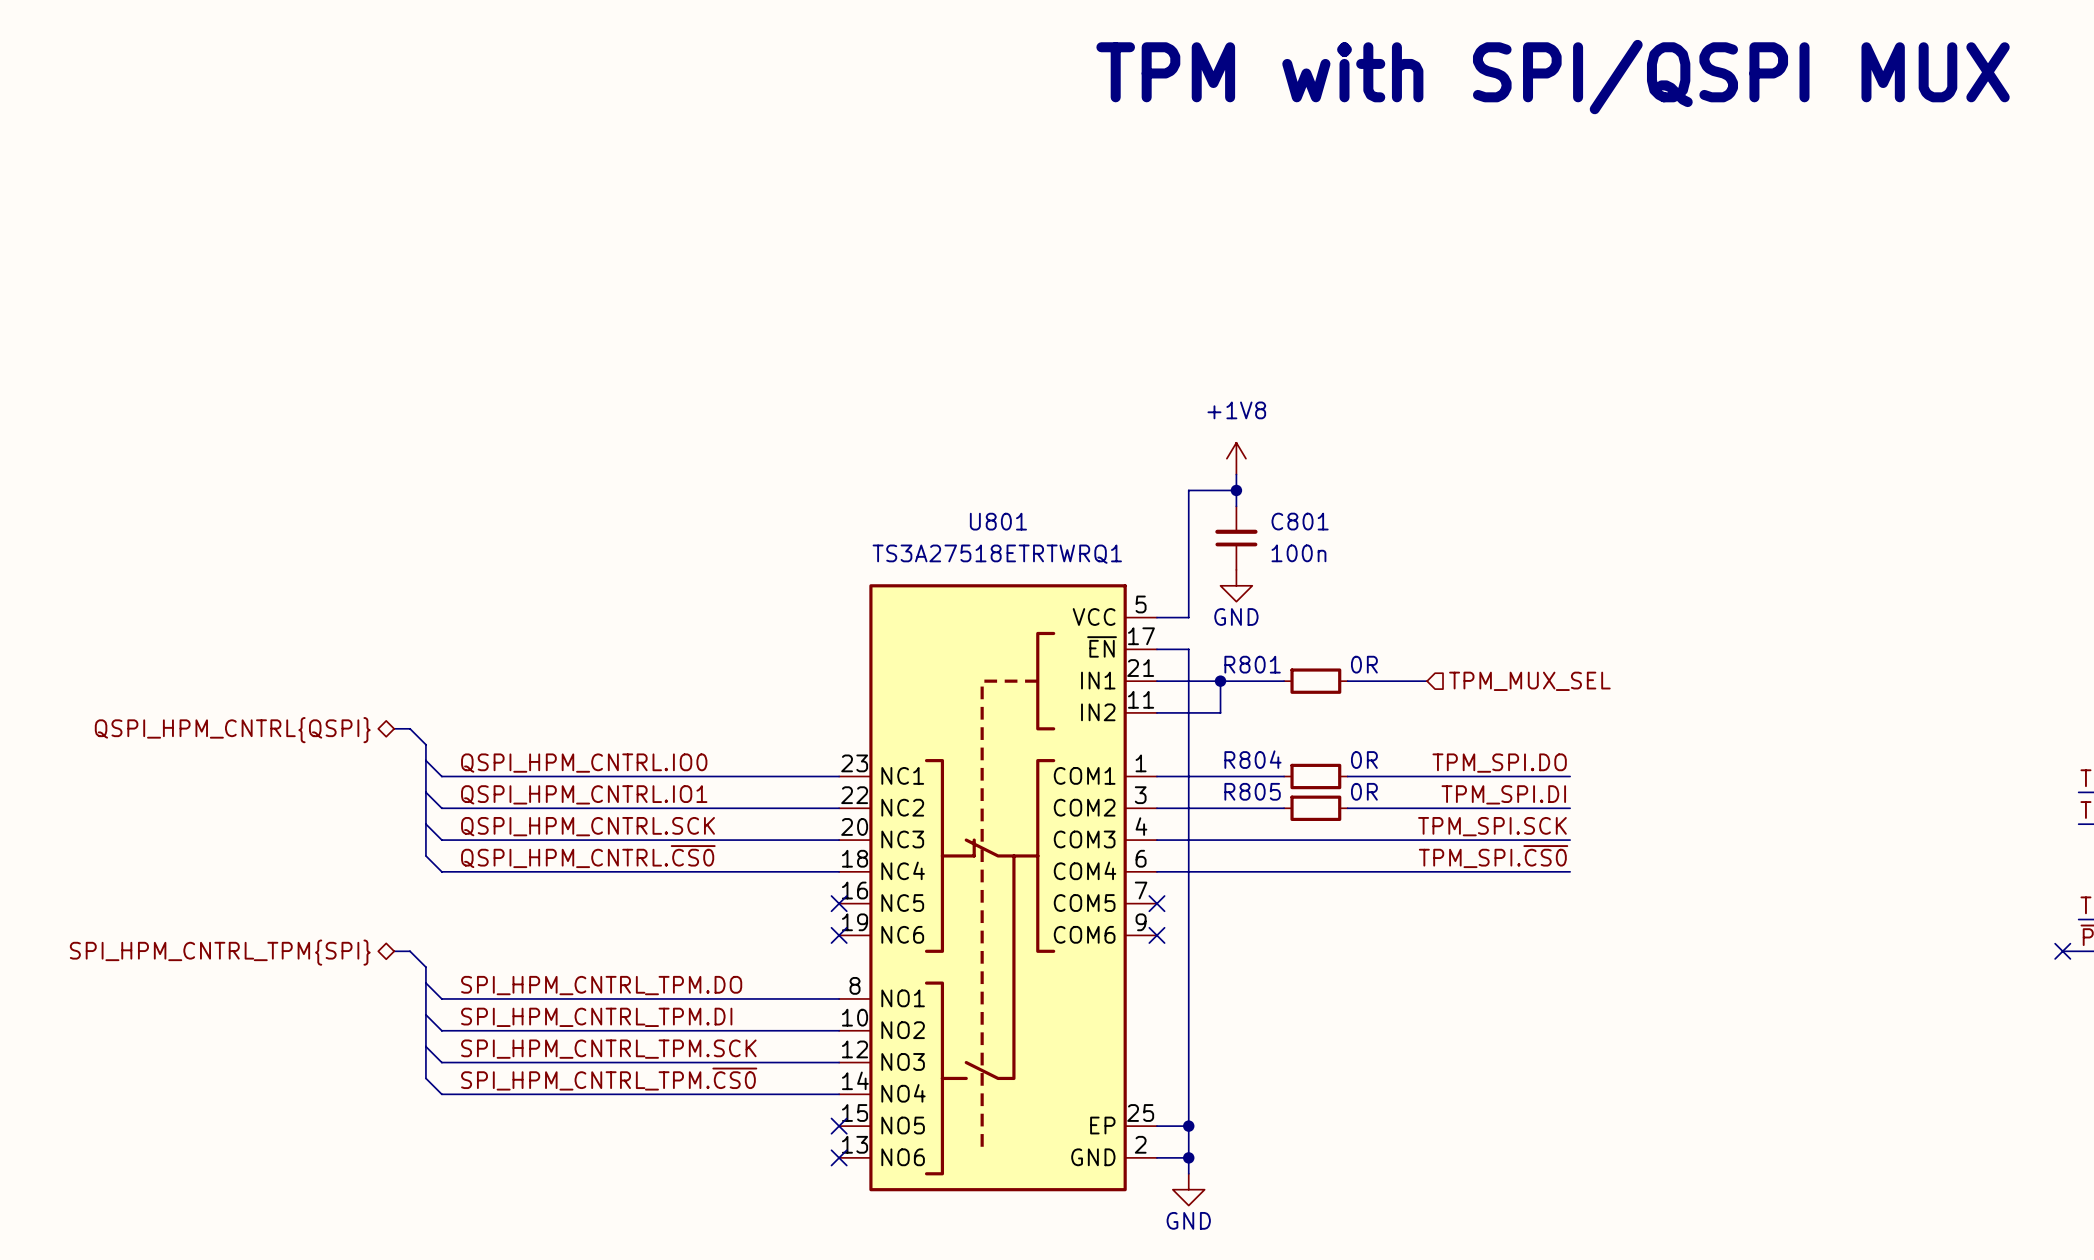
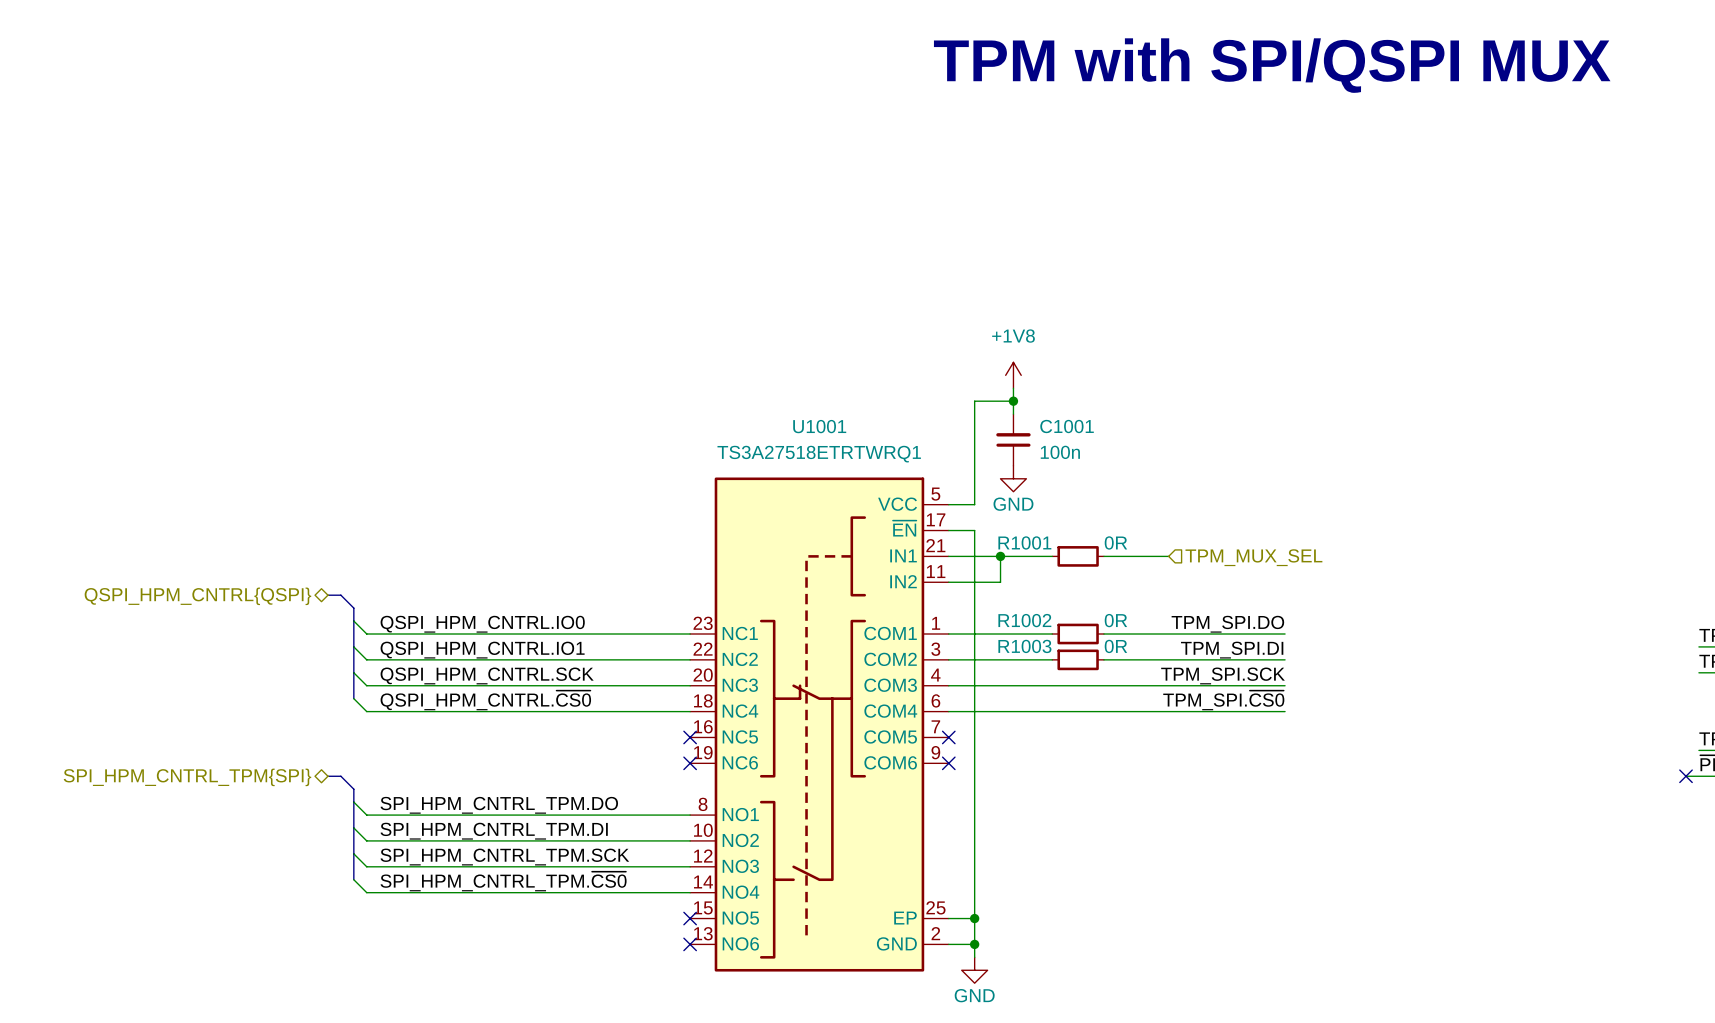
U801 name: U801 (998, 521) -> U1001 (819, 426)
C801 name: C801 (1300, 521) -> C1001 (1067, 426)
R801 name: R801 (1252, 664) -> R1001 (1024, 542)
R804 name: R804 (1252, 759) -> R1002 (1024, 620)
R805 name: R805 (1252, 791) -> R1003 (1024, 646)

